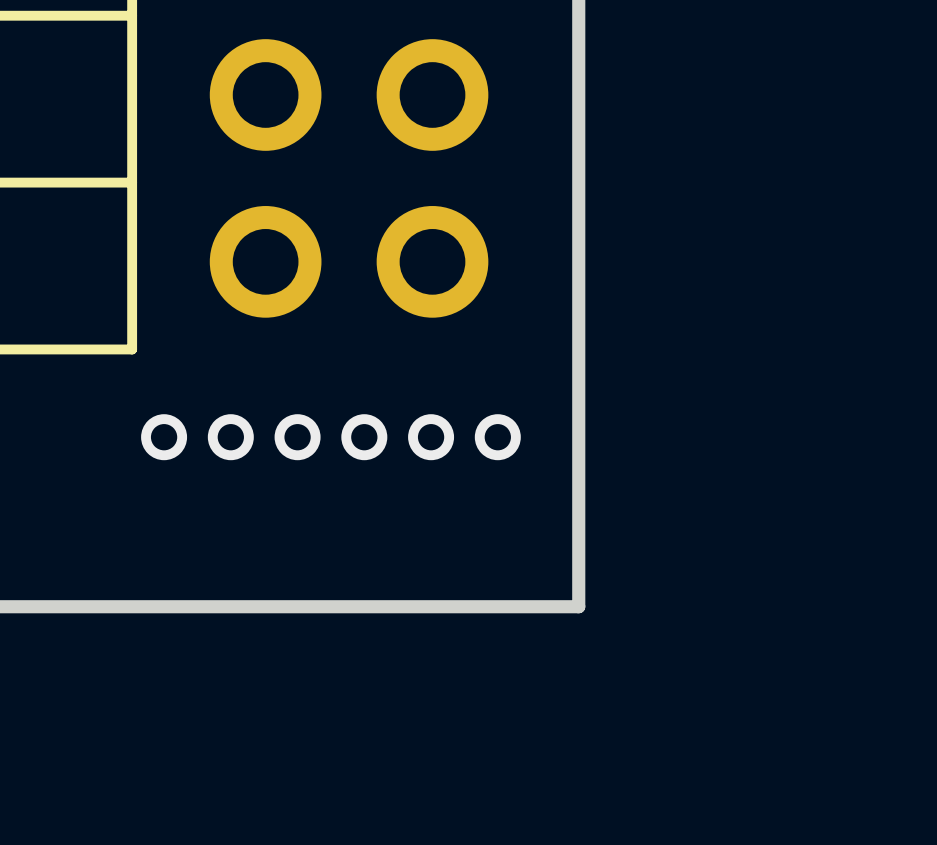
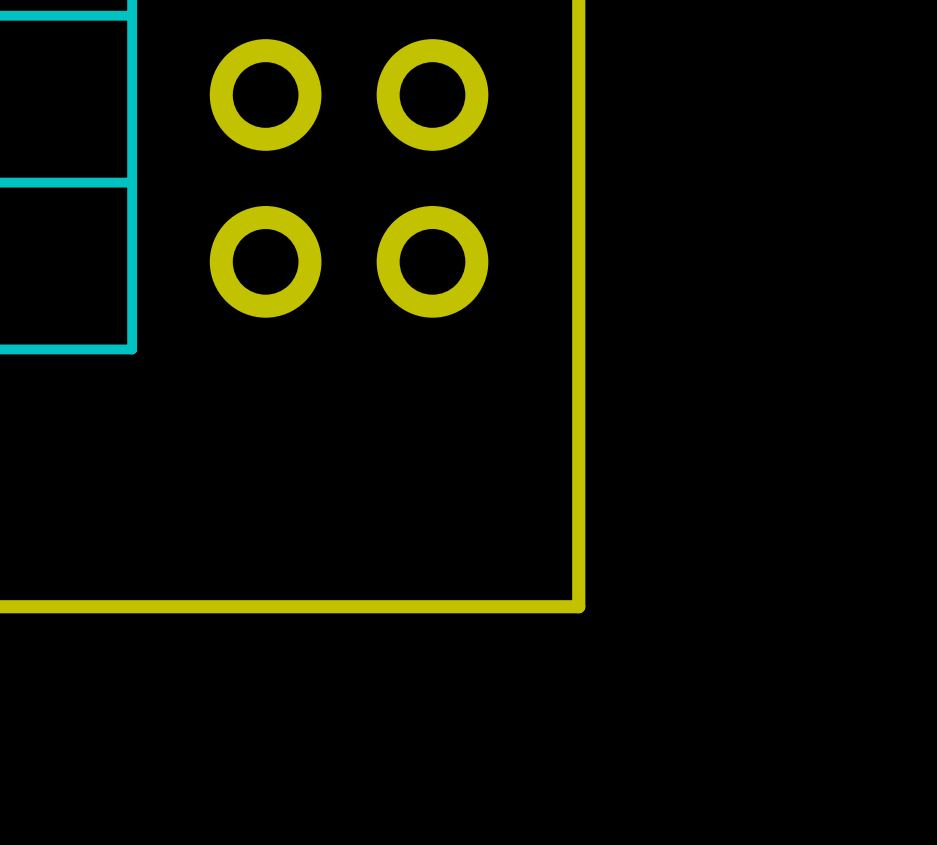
via: (164, 437) -> none
via: (230, 437) -> none
via: (297, 437) -> none
via: (364, 437) -> none
via: (431, 437) -> none
via: (497, 437) -> none

